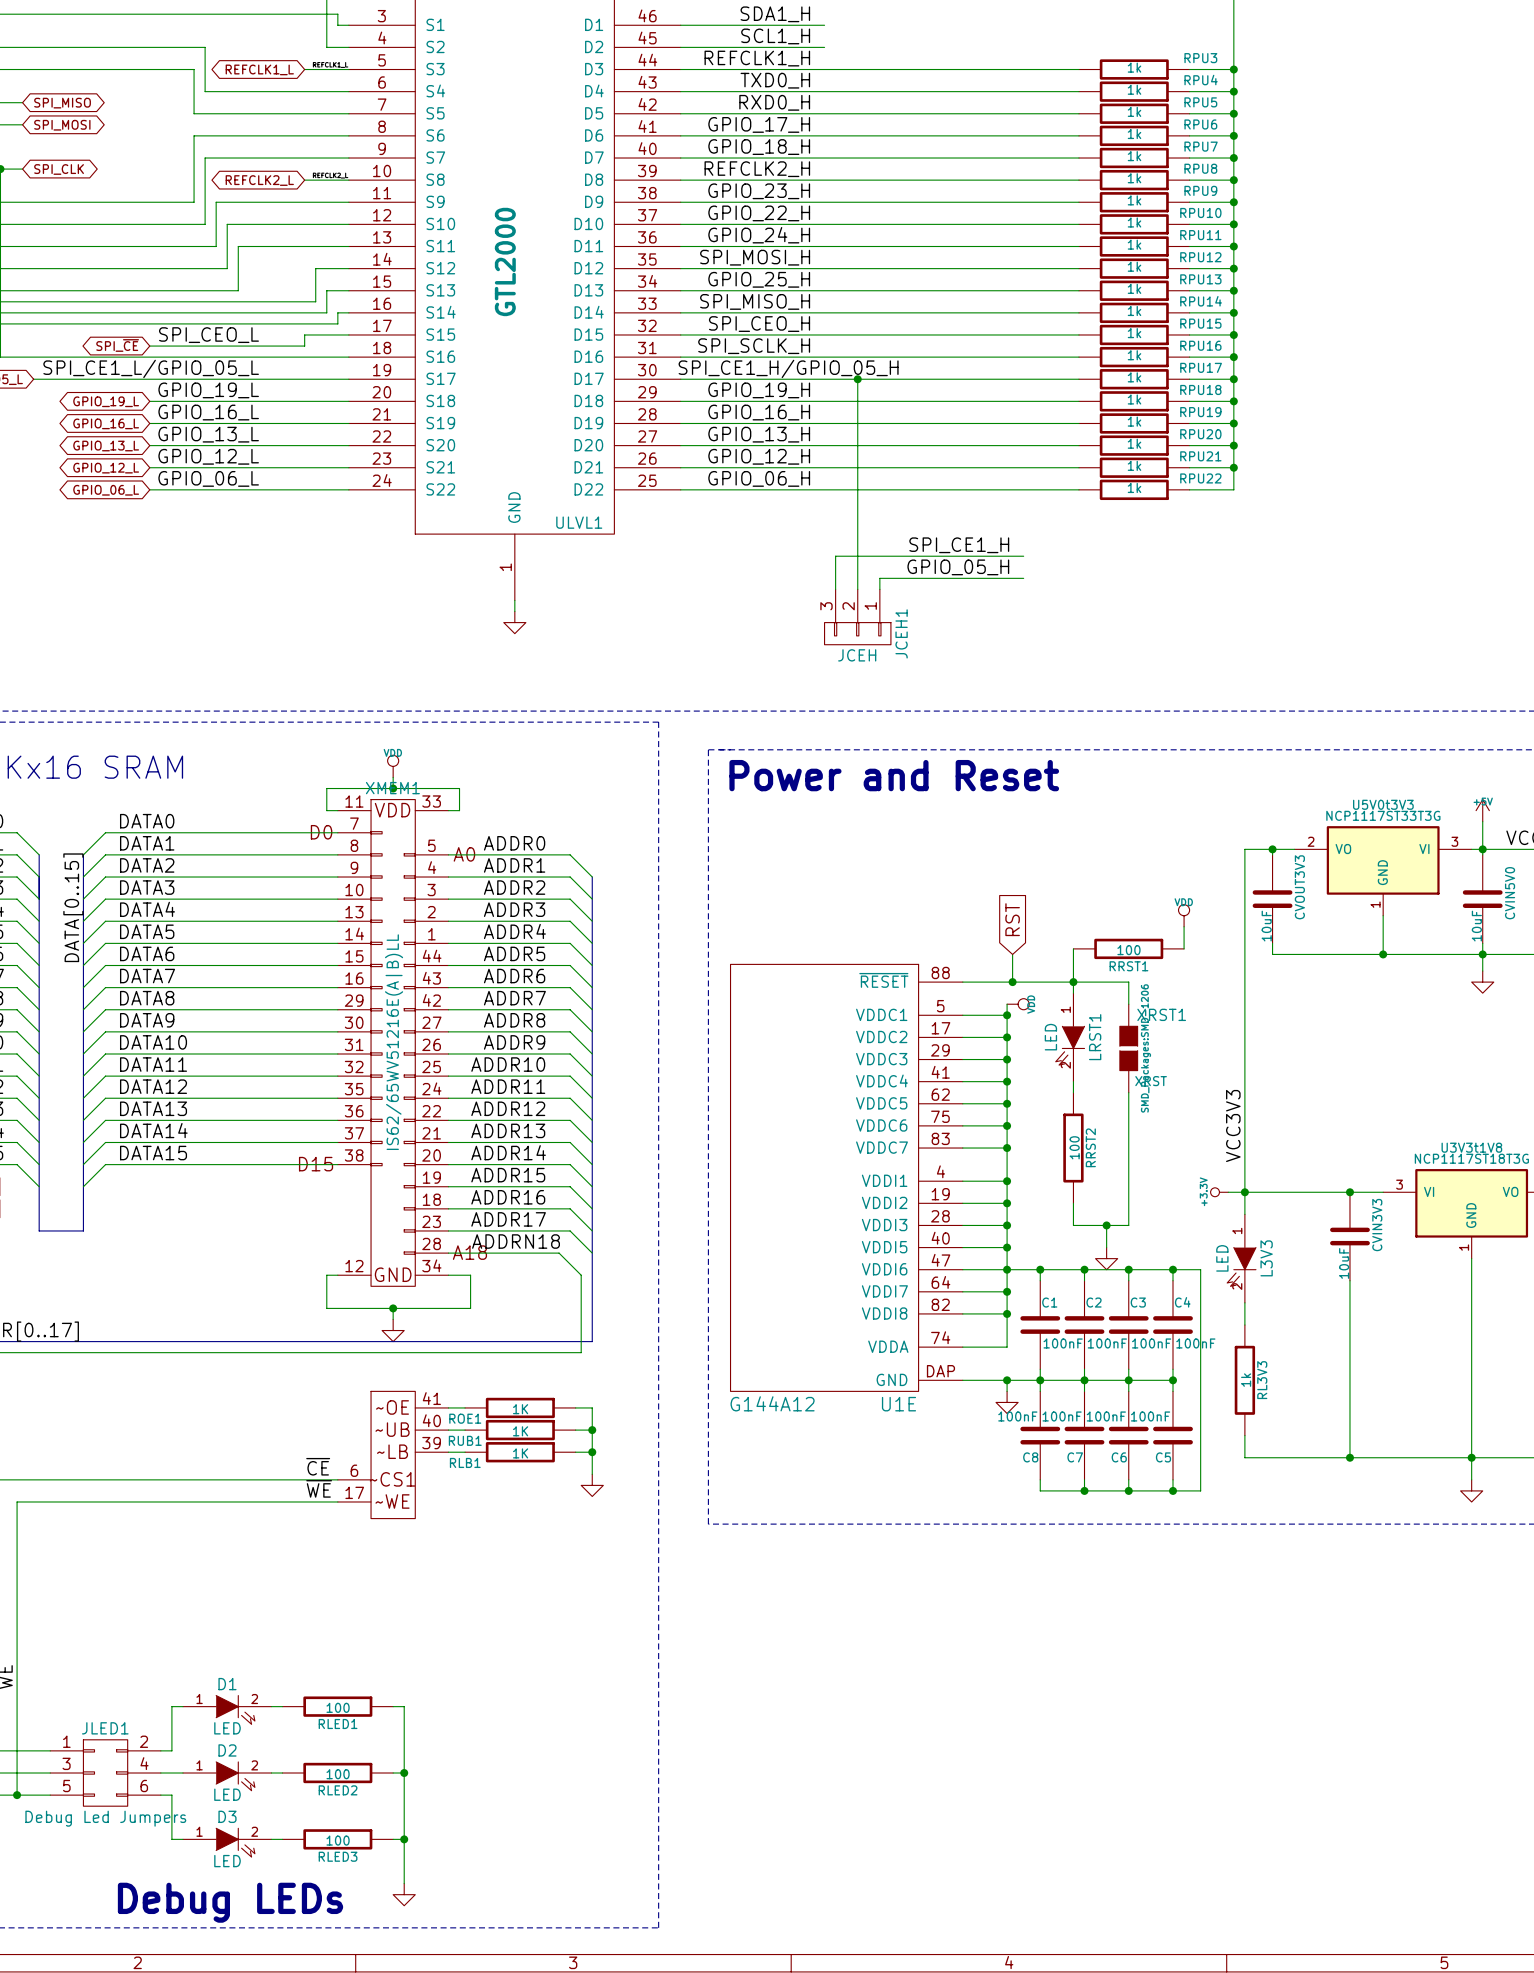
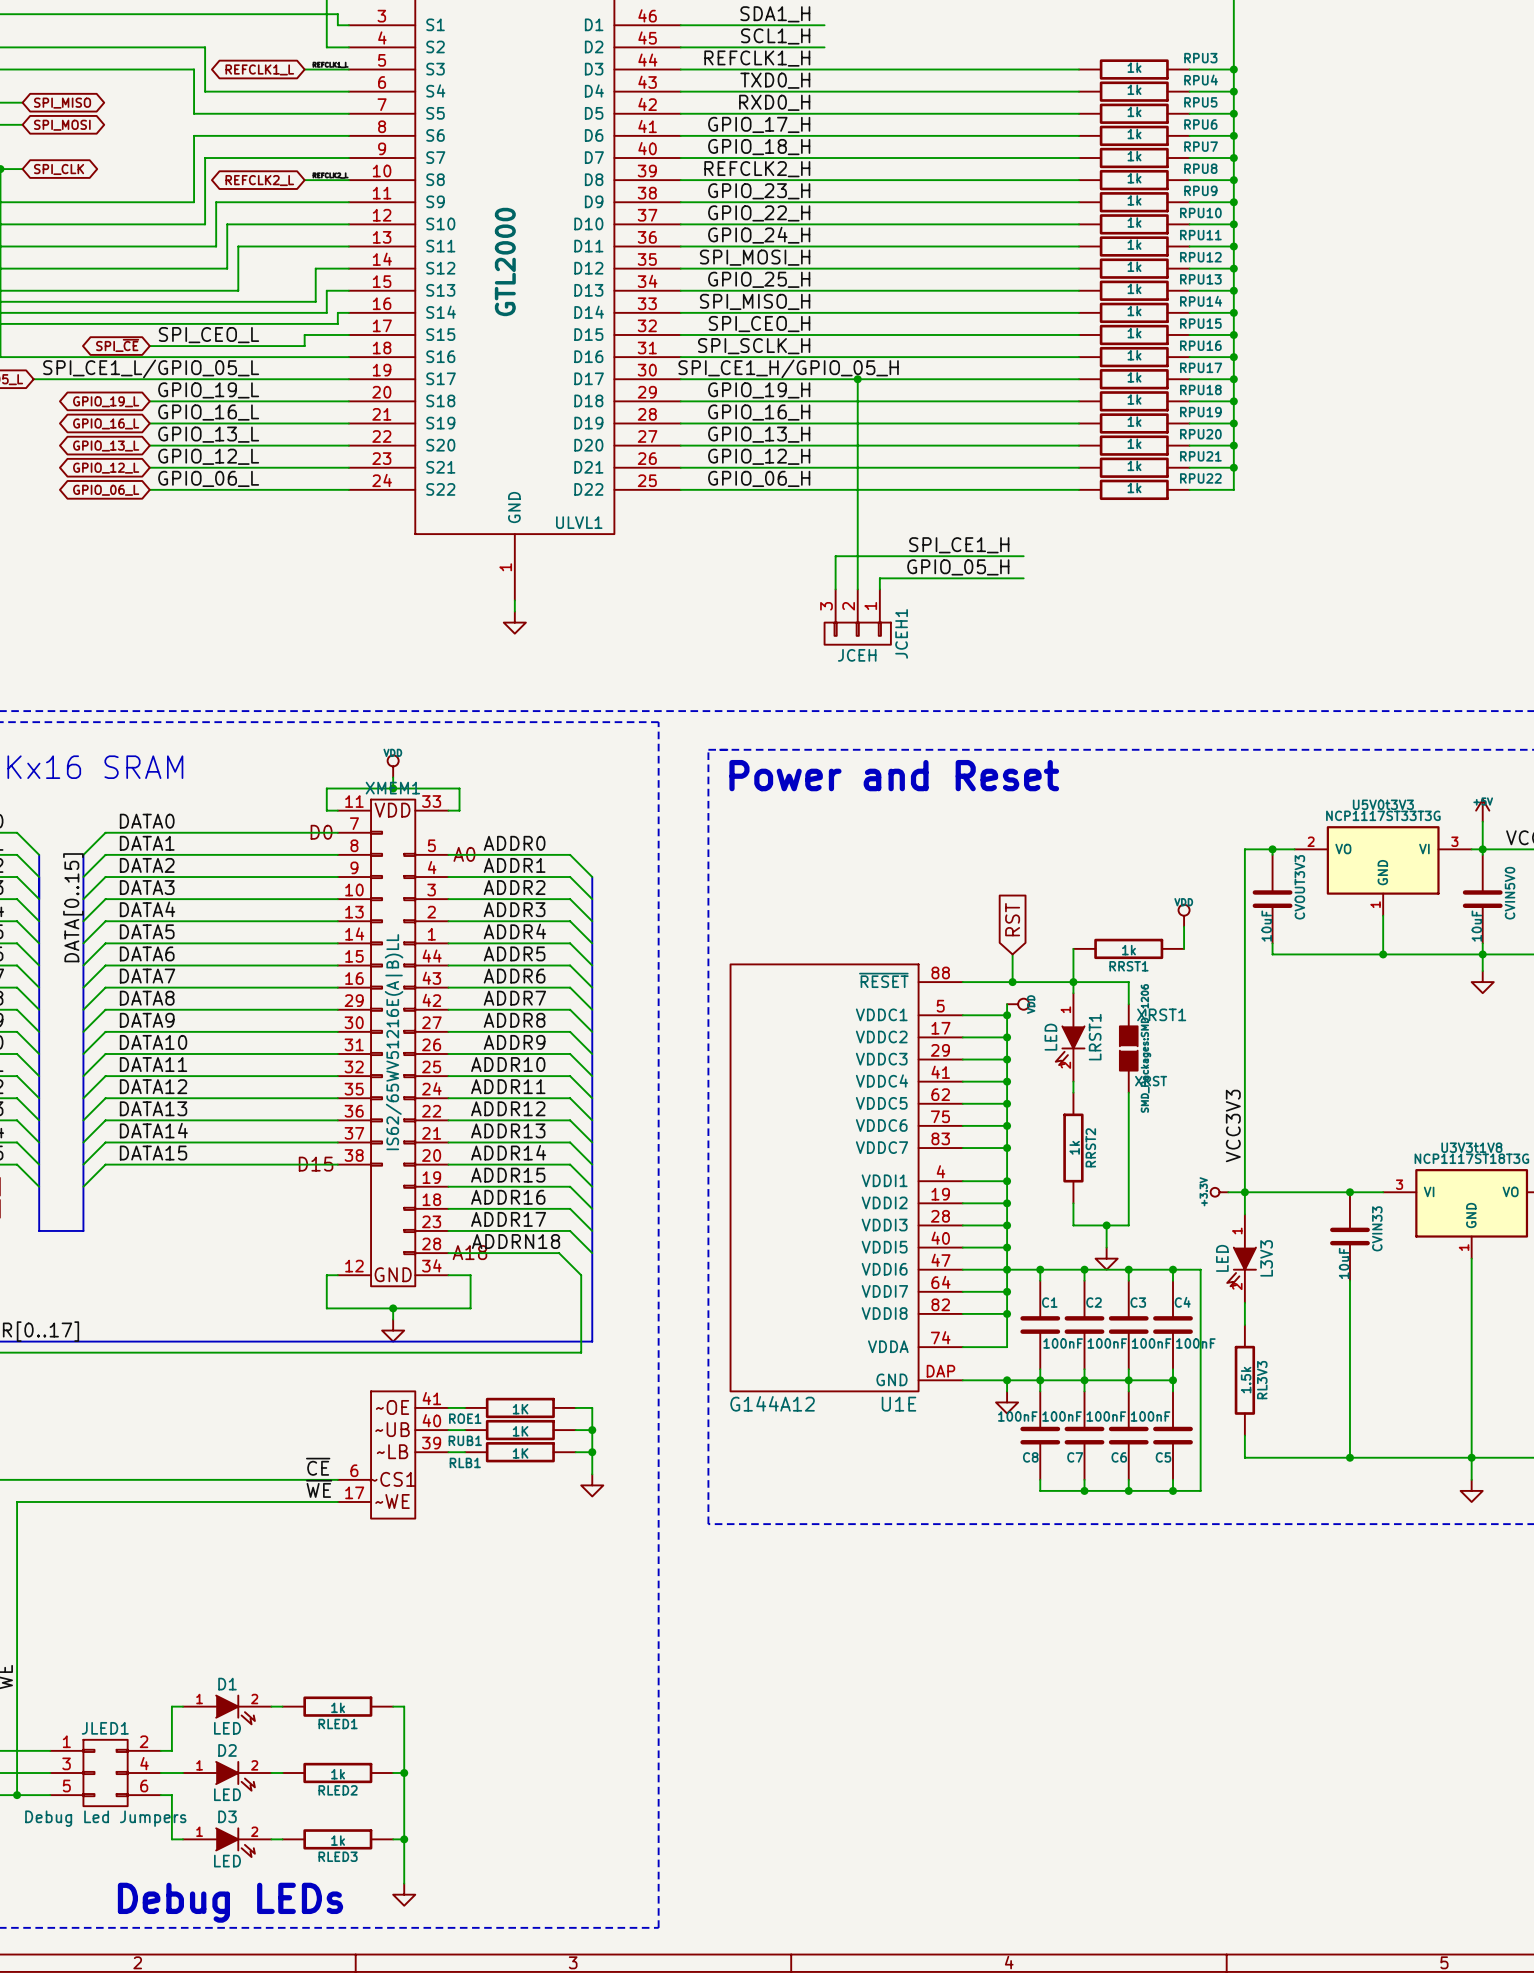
RRST1 value: 100 (1128, 950) -> 1k (1128, 950)
RRST2 value: 100 (1074, 1147) -> 1k (1074, 1147)
CVIN3V3 name: CVIN3V3 (1377, 1225) -> CVIN33 (1377, 1228)
RL3V3 value: 1k (1246, 1380) -> 1.5k (1246, 1380)
RLED1 value: 100 (338, 1707) -> 1k (338, 1707)
RLED2 value: 100 (338, 1774) -> 1k (338, 1774)
RLED3 value: 100 (338, 1840) -> 1k (338, 1840)

